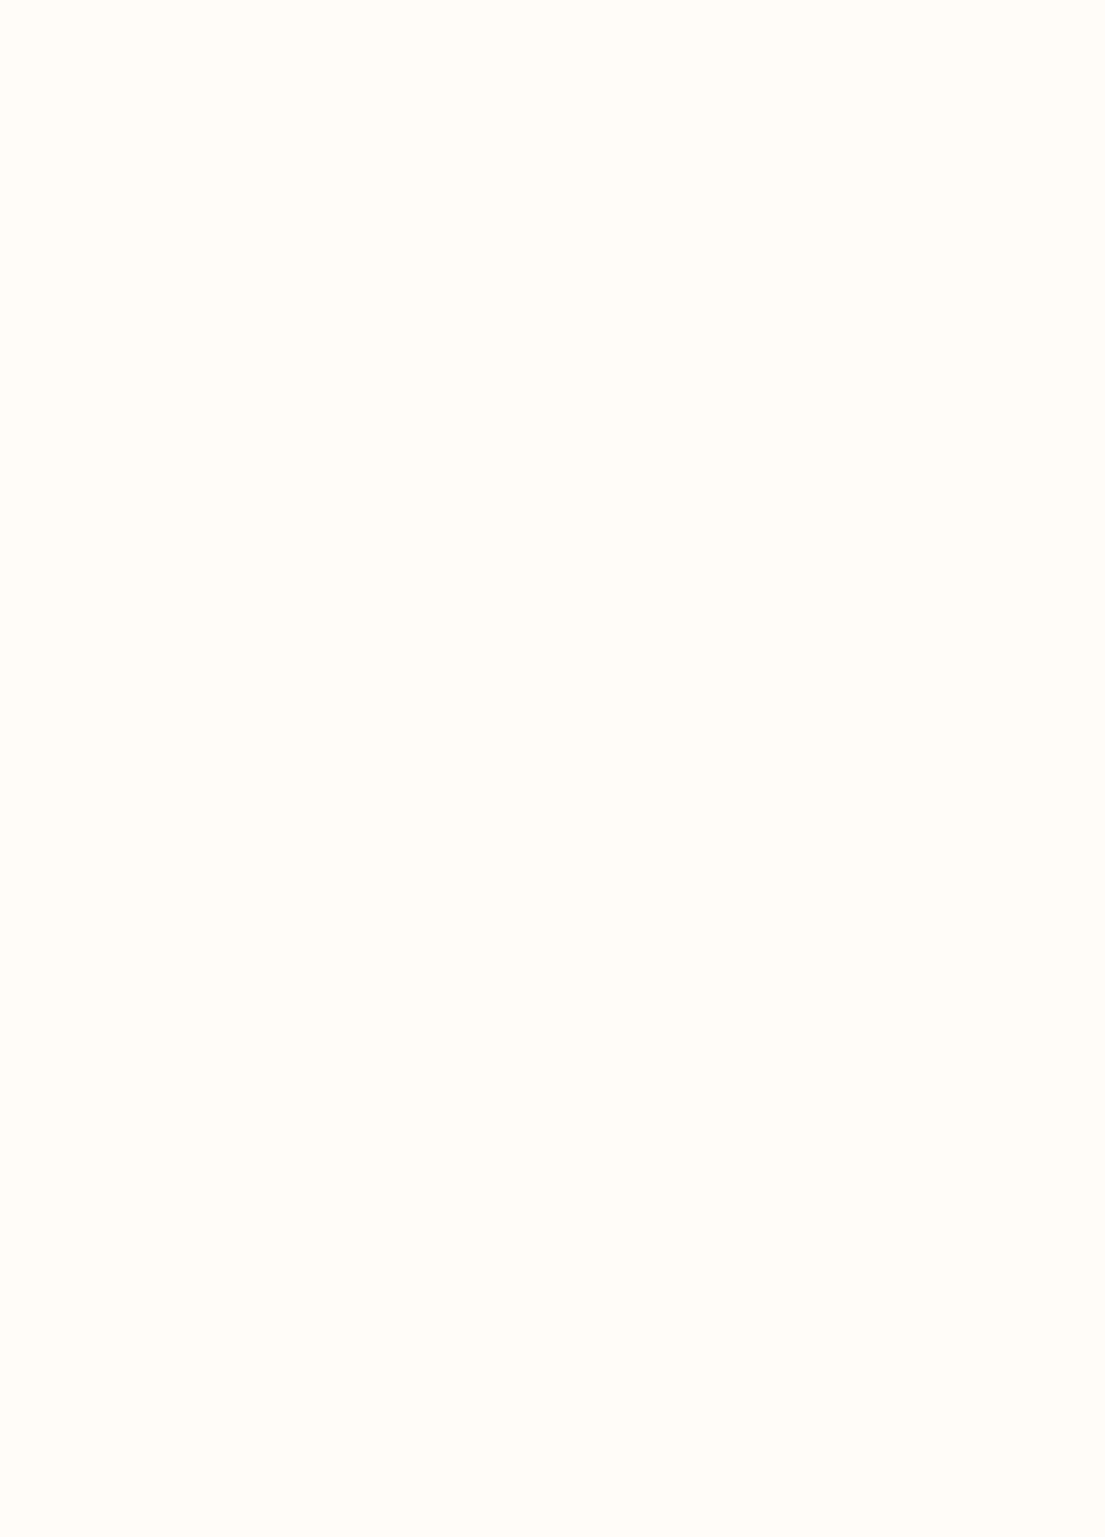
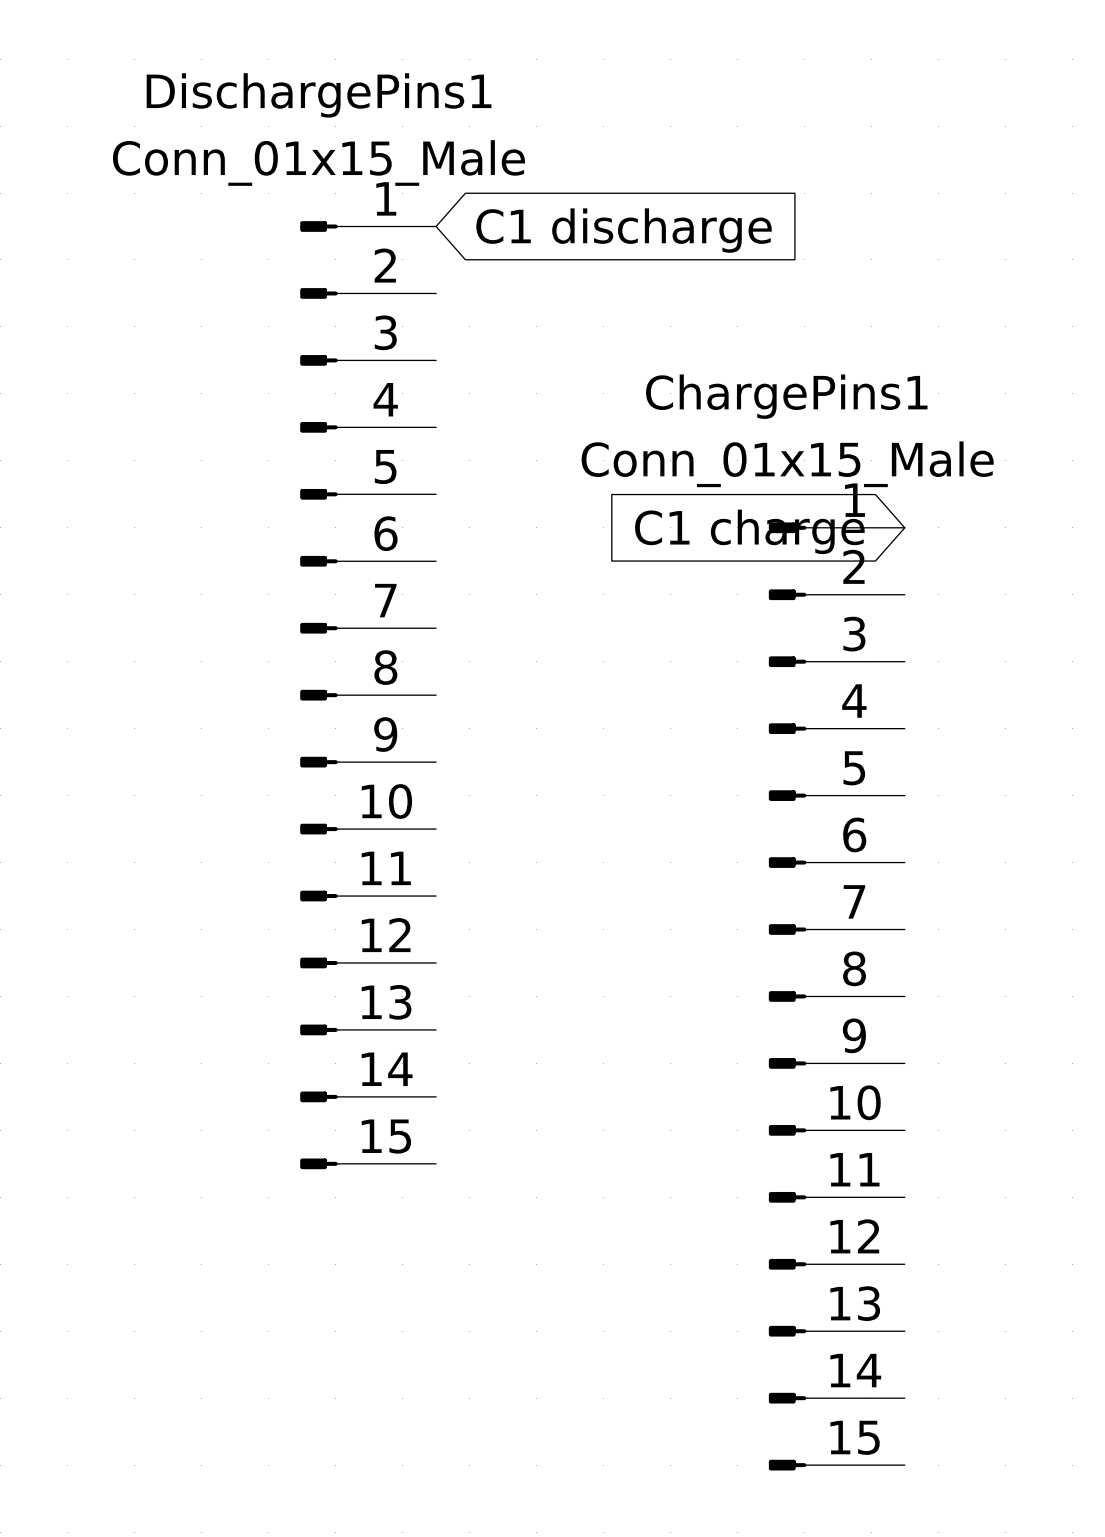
global label: none -> C1 discharge (624, 230)
global label: none -> C1 charge (749, 531)
DischargePins1: none -> Conn_01x15_Male (368, 695)
ChargePins1: none -> Conn_01x15_Male (836, 996)

